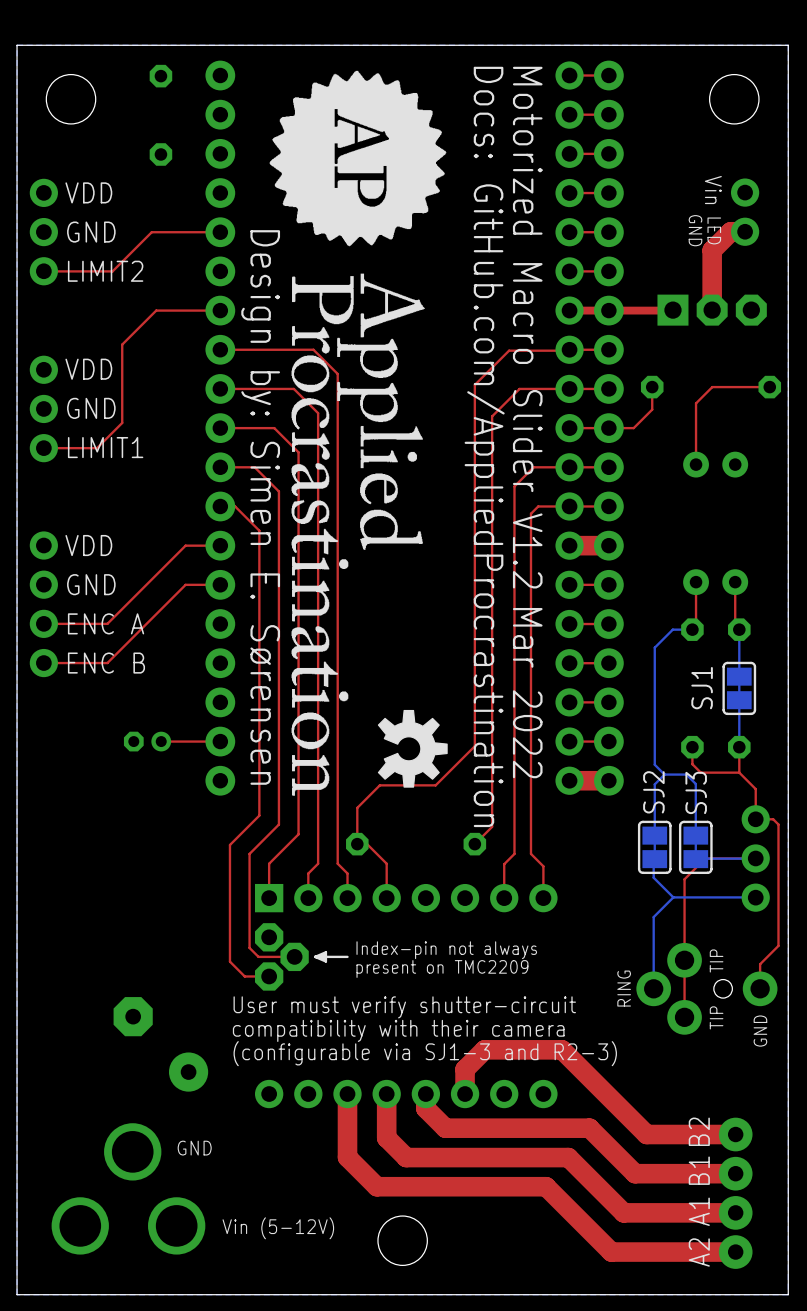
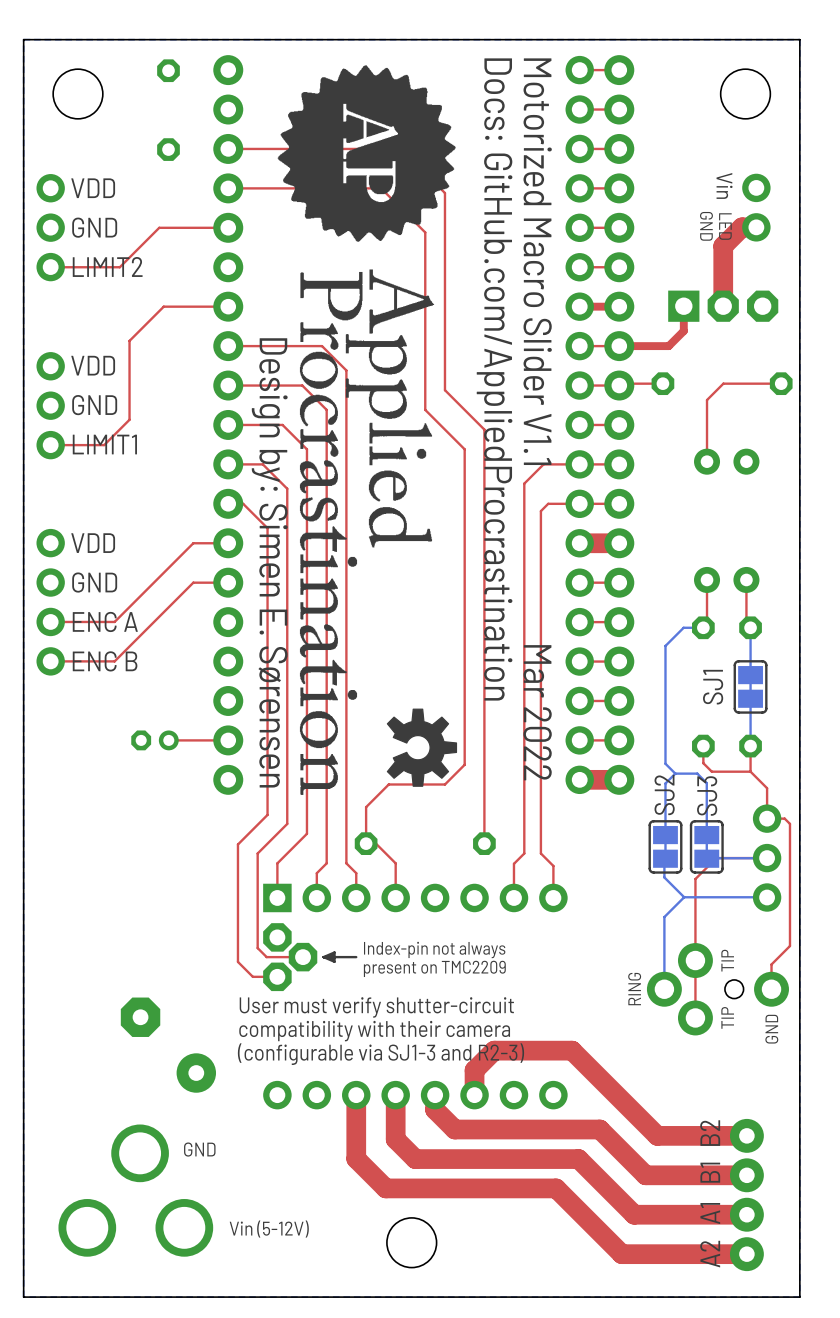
top track: none -> (228, 188) (381, 188) (425, 232) (425, 409) (464, 449) (464, 764)
top track: (672, 310) (608, 310) -> (683, 306) (683, 331) (668, 346) (619, 346)
text: Motorized Macro Slider V1.2 (527, 327) -> Motorized Macro Slider V1.1 (537, 261)
top track: (569, 349) (509, 350) (474, 384) (474, 432) -> (228, 148) (400, 148) (444, 193) (444, 390) (484, 429)
top track: (652, 387) (652, 409) (633, 428) (608, 428) -> (662, 383) (621, 383) (619, 385)
top track: (569, 388) (519, 388) (492, 416) (492, 826) (474, 844) -> none
top track: (474, 746) (455, 765) -> (484, 745) (484, 843)

